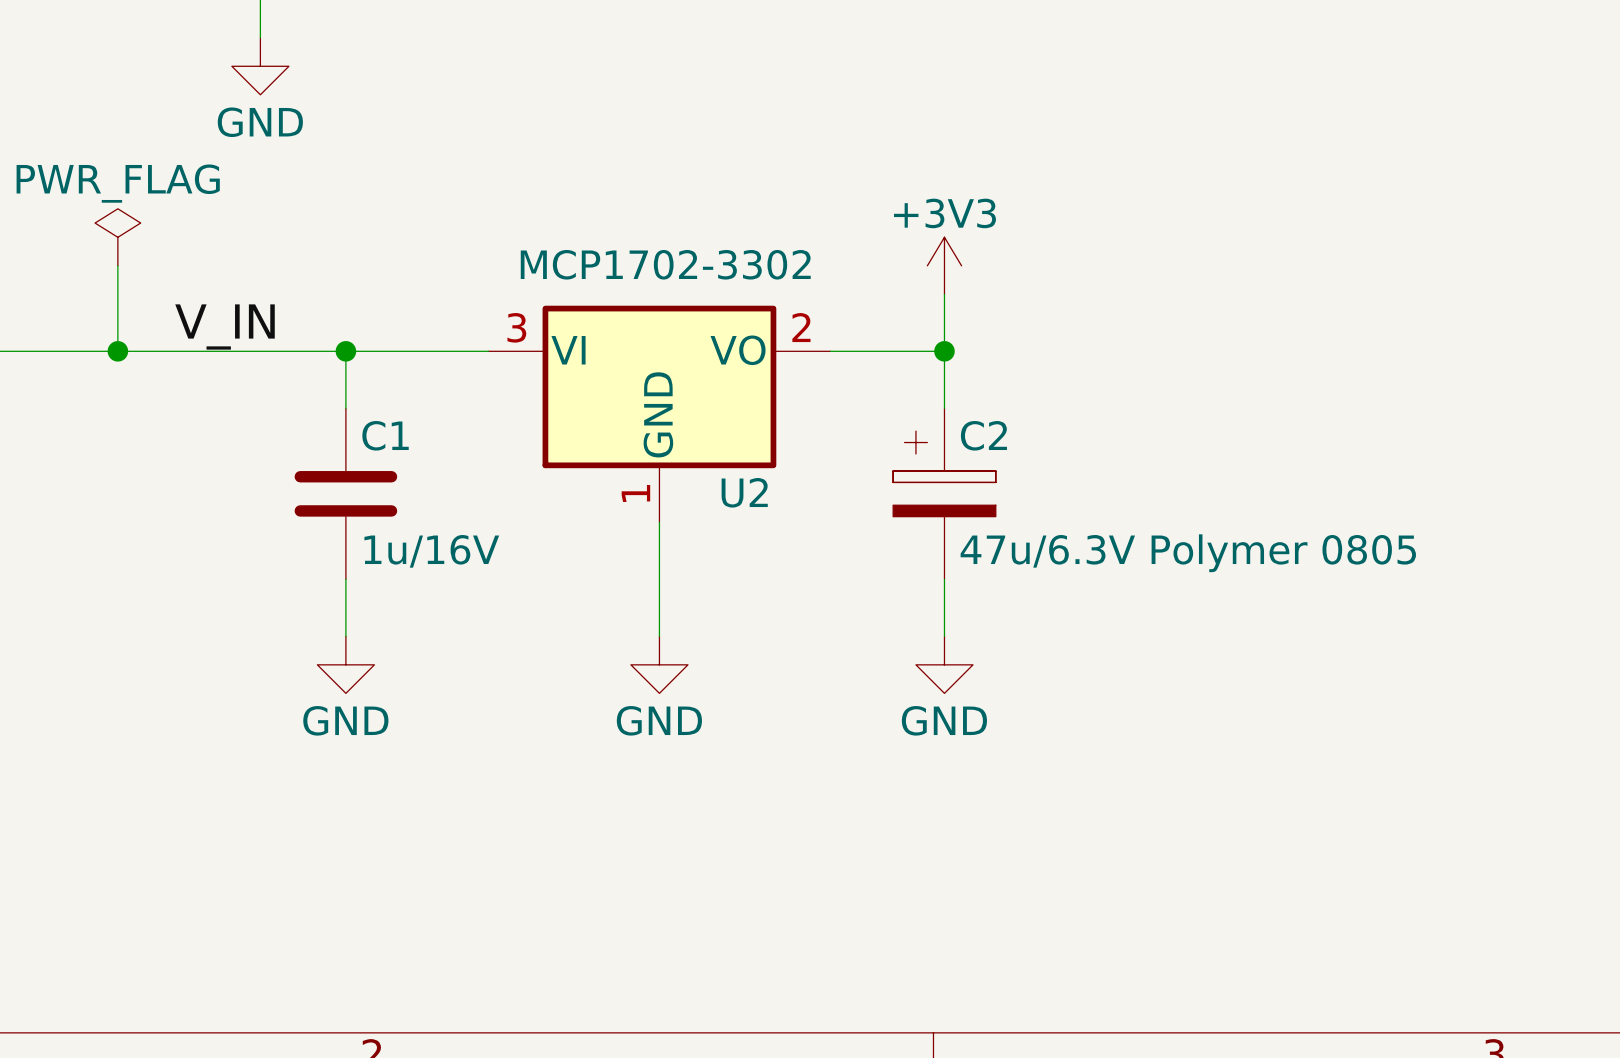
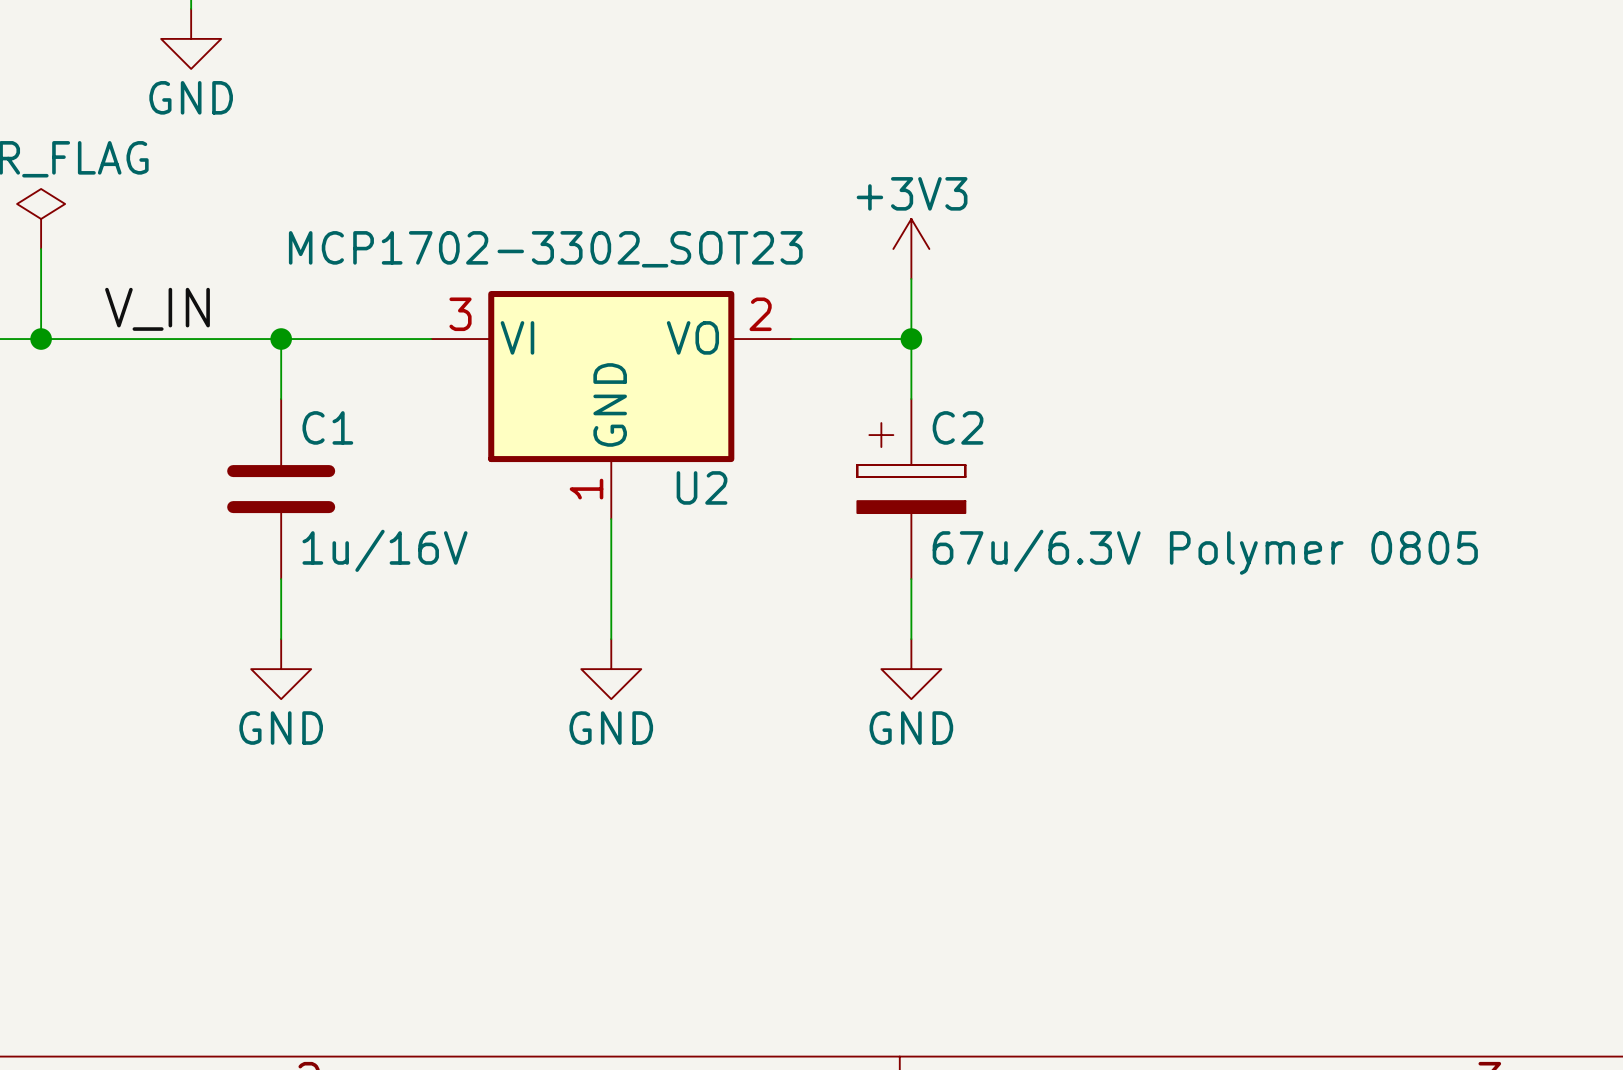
U2 value: MCP1702-3302 (665, 264) -> MCP1702-3302_SOT23 (545, 249)
C2 value: 47u/6.3V Polymer 0805 (1188, 553) -> 67u/6.3V Polymer 0805 (1205, 552)

